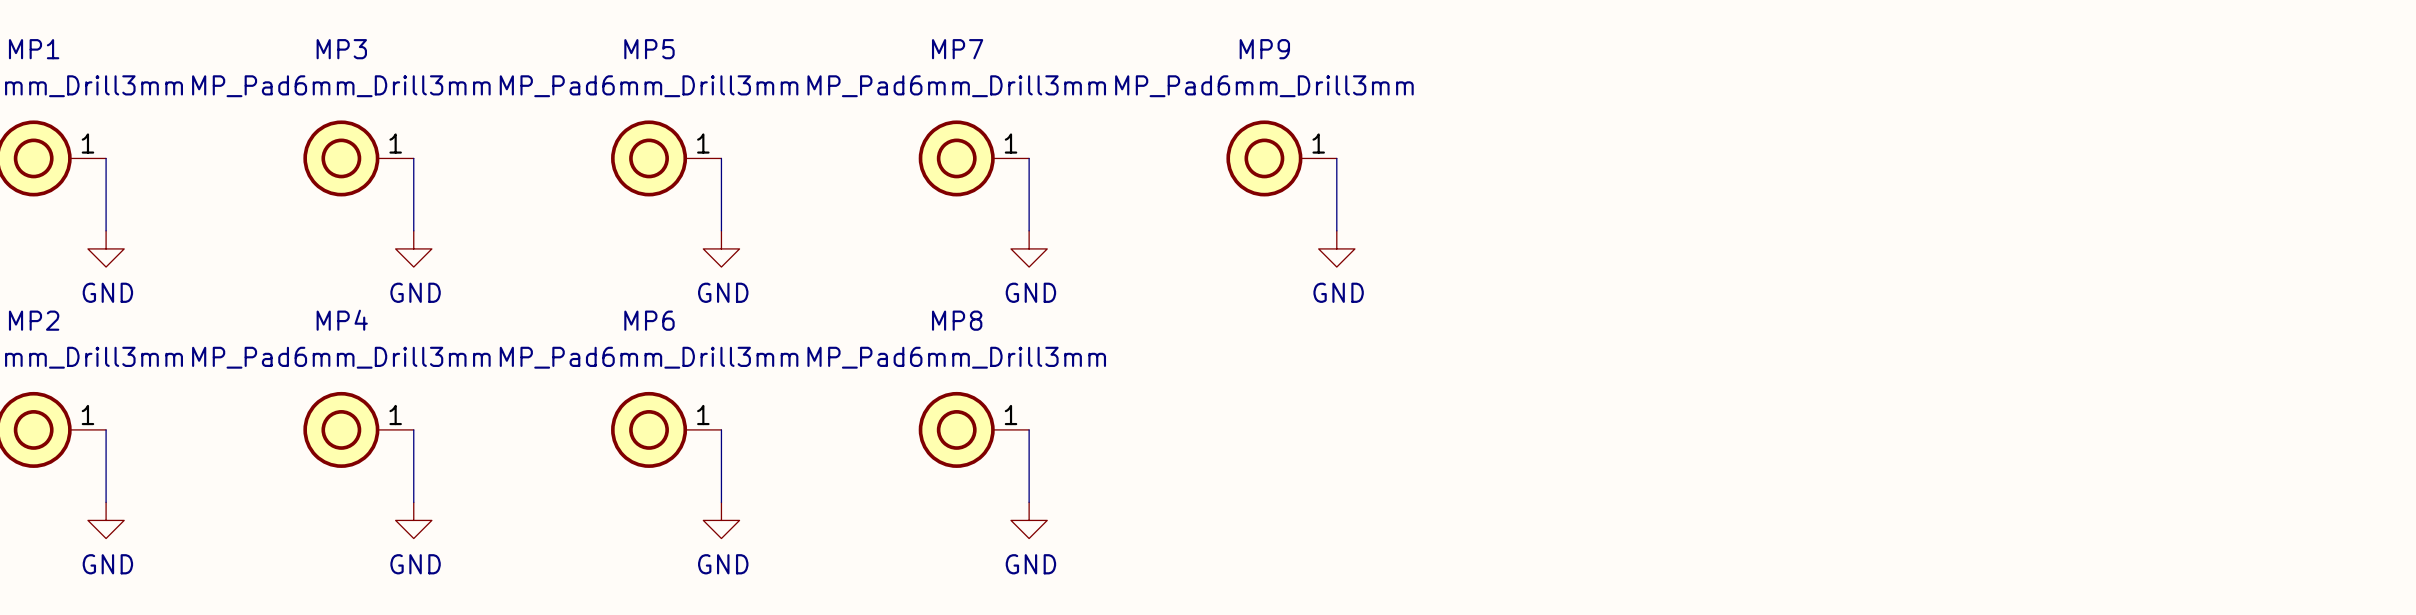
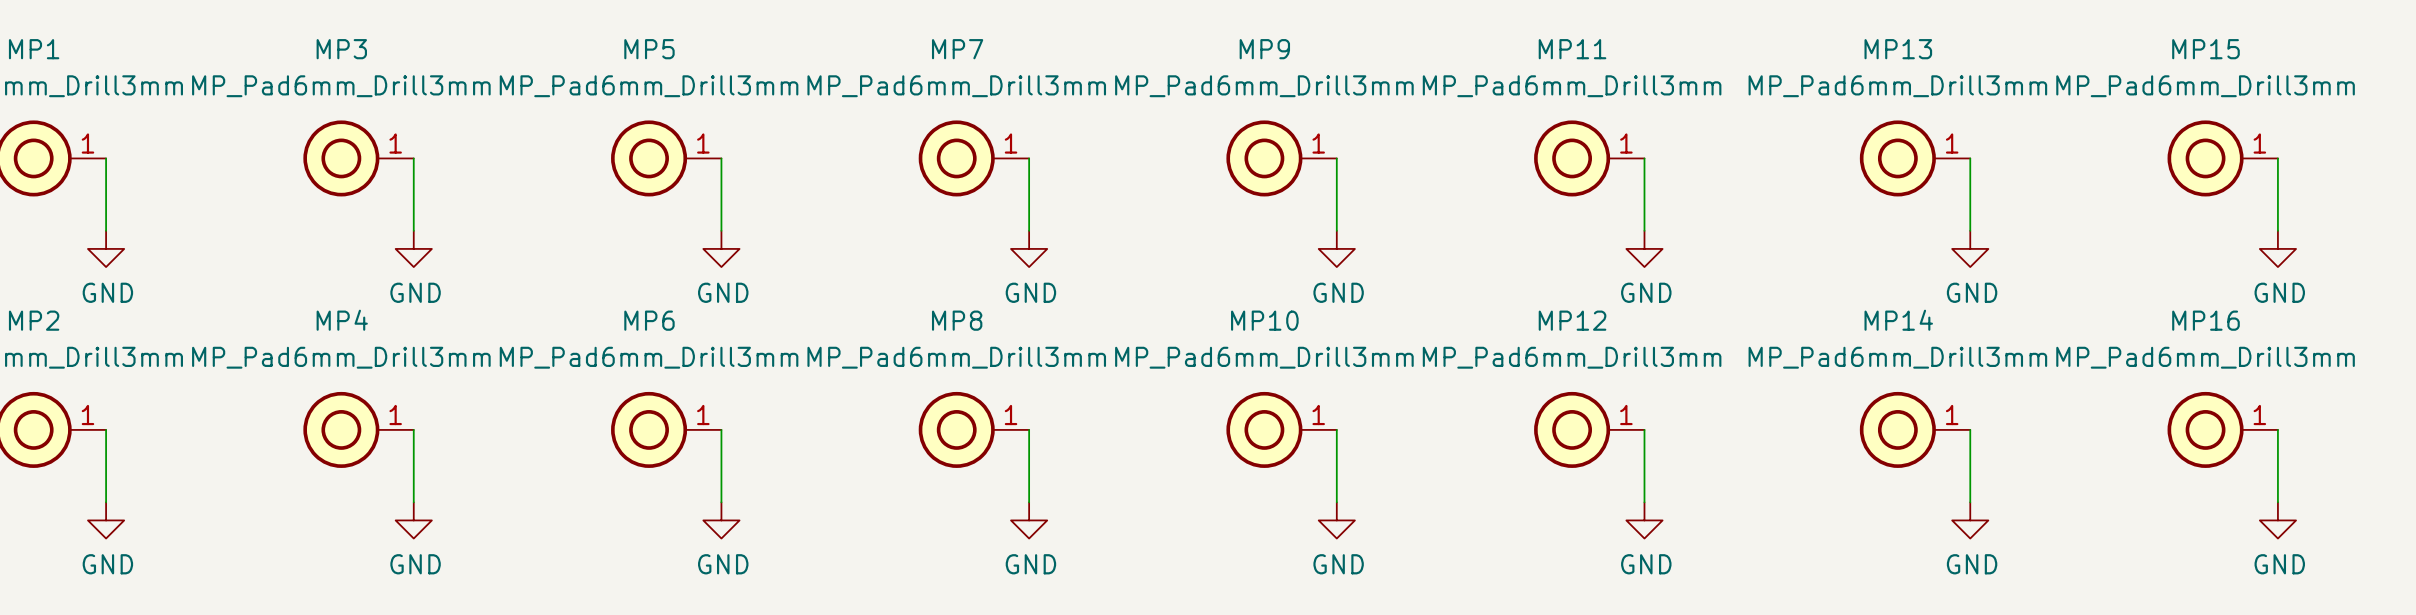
MP11: none -> MP_Pad6mm_Drill3mm (1589, 158)
wire: none -> (1644, 158) (1644, 230)
MP13: none -> MP_Pad6mm_Drill3mm (1915, 158)
wire: none -> (1970, 158) (1970, 230)
MP15: none -> MP_Pad6mm_Drill3mm (2222, 158)
wire: none -> (2277, 158) (2277, 230)
power symbol: none -> GND (1644, 248)
power symbol: none -> GND (1970, 248)
power symbol: none -> GND (2277, 248)
MP10: none -> MP_Pad6mm_Drill3mm (1281, 429)
wire: none -> (1336, 429) (1336, 502)
MP12: none -> MP_Pad6mm_Drill3mm (1589, 429)
wire: none -> (1644, 429) (1644, 502)
MP14: none -> MP_Pad6mm_Drill3mm (1915, 429)
wire: none -> (1970, 429) (1970, 502)
MP16: none -> MP_Pad6mm_Drill3mm (2222, 429)
wire: none -> (2277, 429) (2277, 502)
power symbol: none -> GND (1336, 520)
power symbol: none -> GND (1644, 520)
power symbol: none -> GND (1970, 520)
power symbol: none -> GND (2277, 520)

